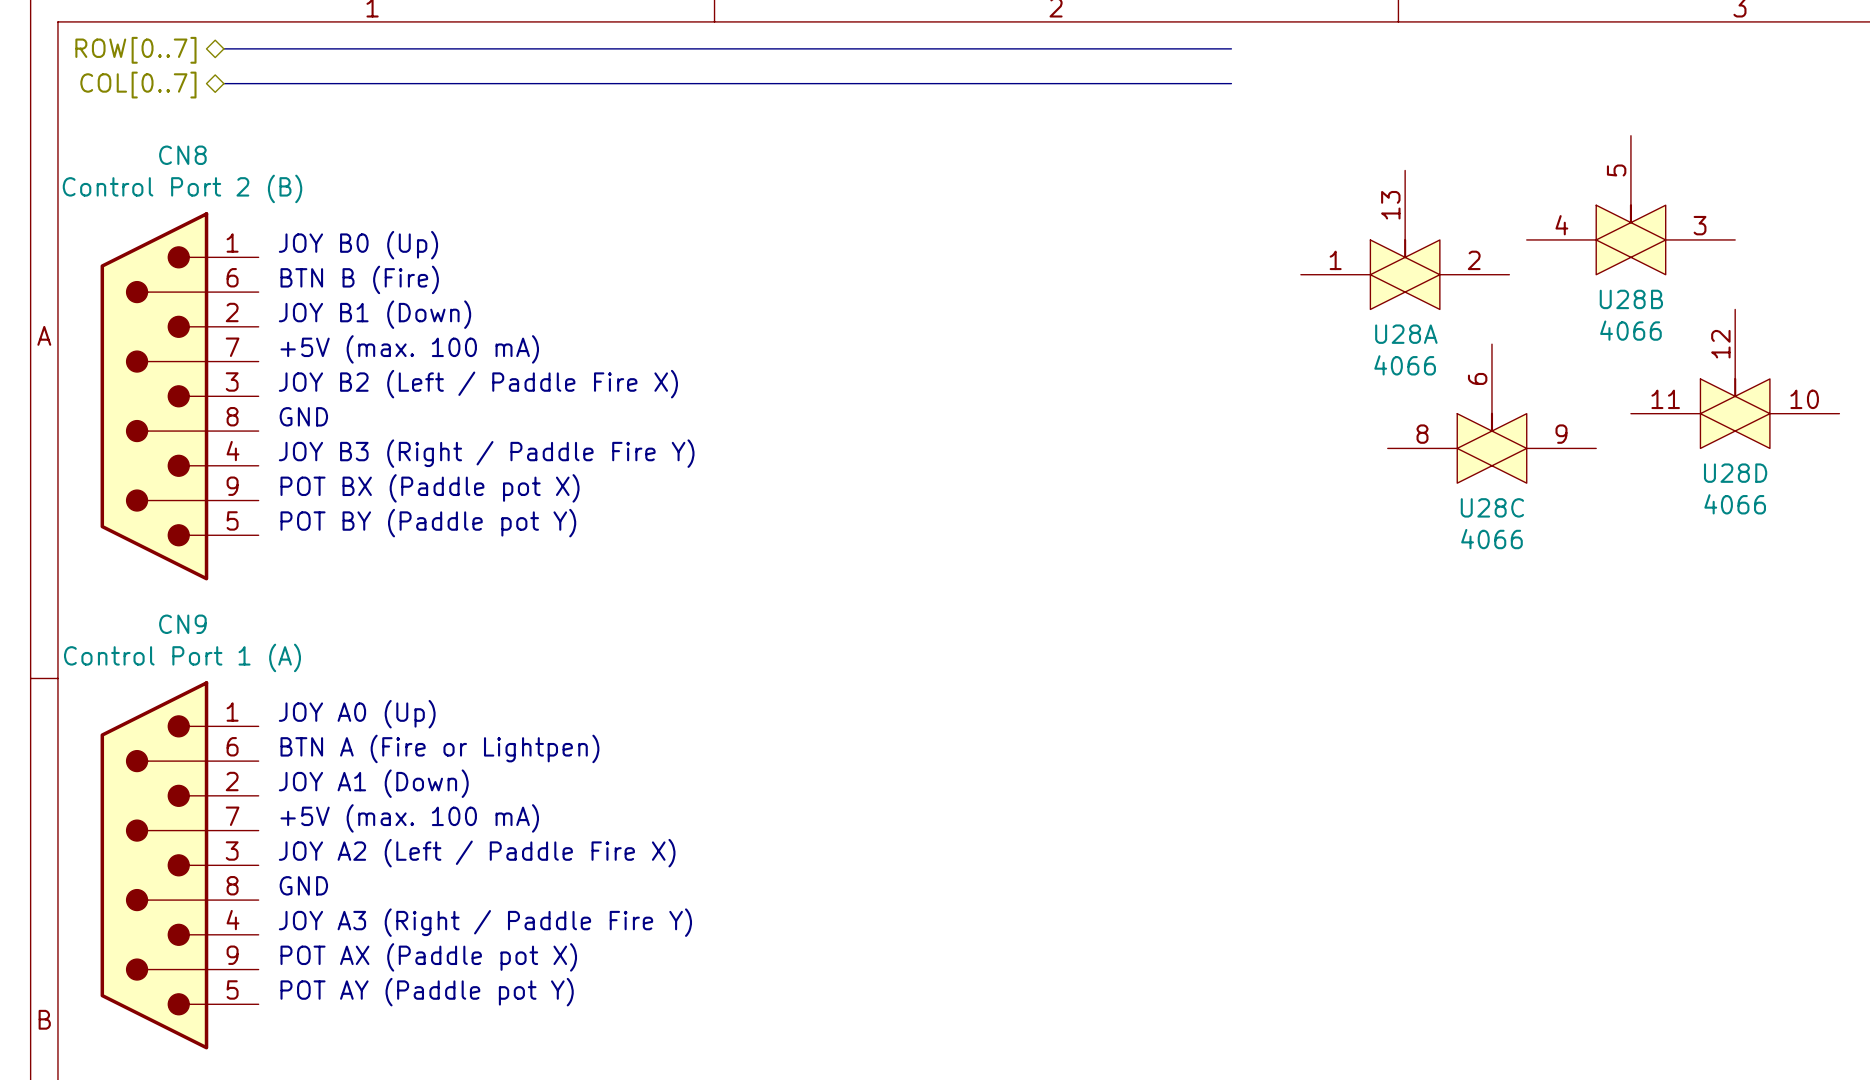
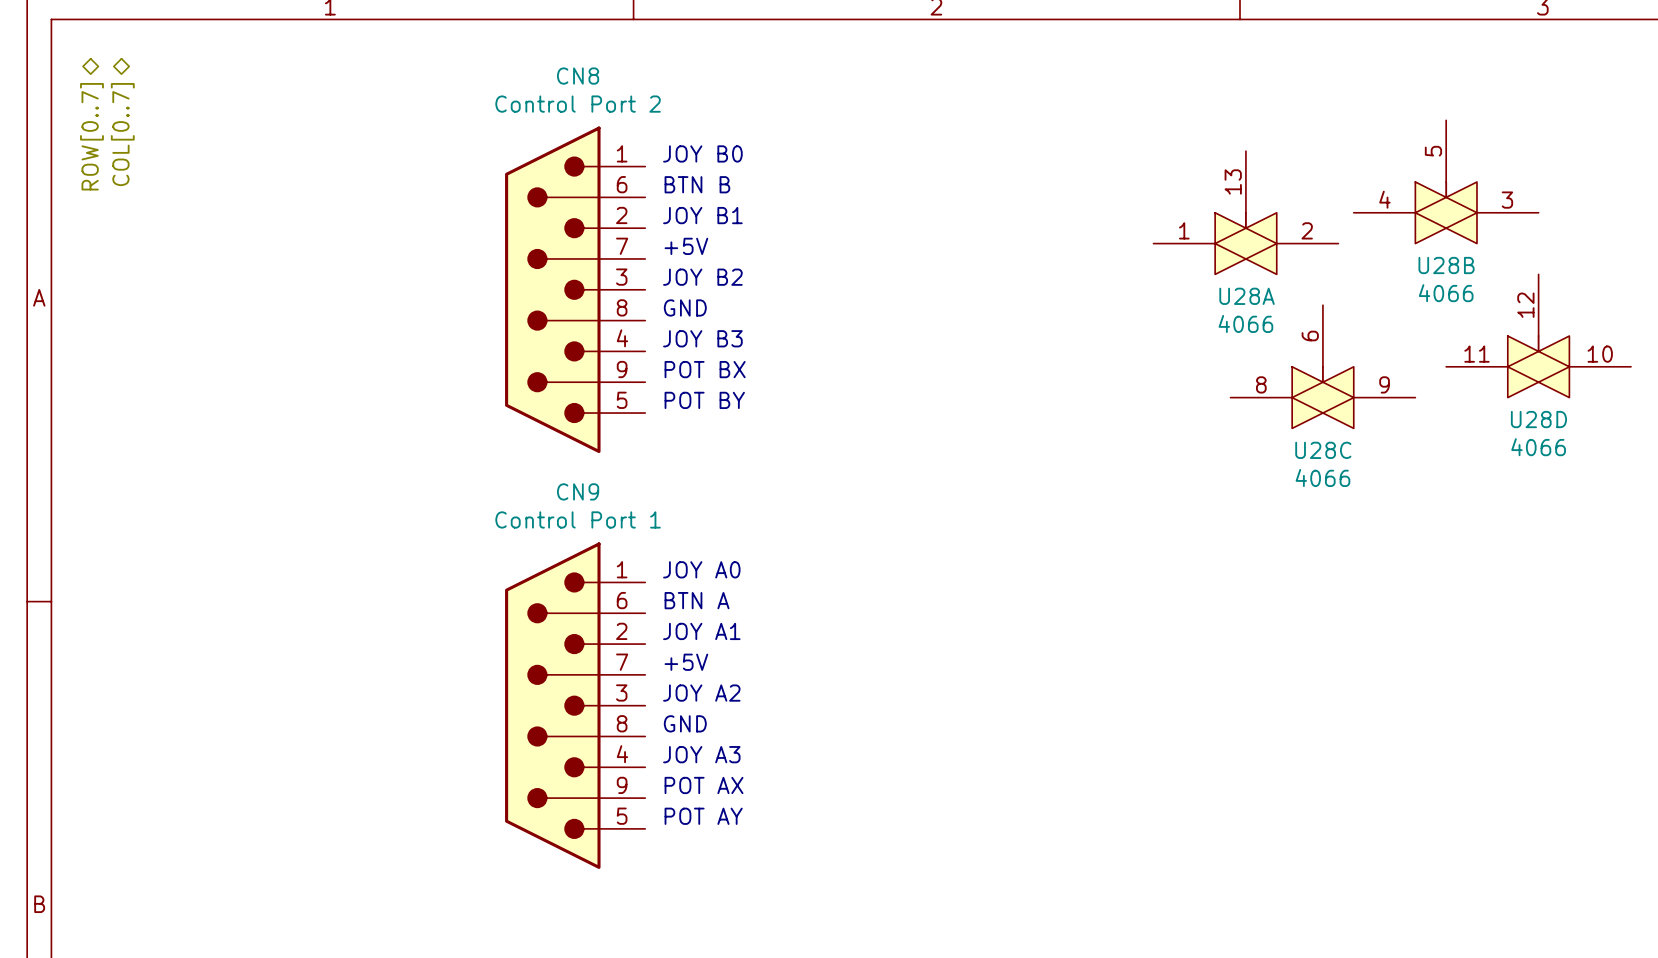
bus: (223, 48) (1231, 48) -> none
hierarchical label rotation: 0° (135, 50) -> 90° counterclockwise (91, 136)
bus: (223, 83) (1231, 83) -> none
hierarchical label rotation: 0° (138, 85) -> 90° counterclockwise (122, 134)
text: none -> JOY B0 (702, 153)
CN8 value: Control Port 2 (B) (182, 188) -> Control Port 2 (578, 104)
text: none -> BTN B (697, 184)
text: none -> JOY B1 (702, 215)
text: JOY B0 (Up) (358, 245) -> none
text: none -> +5V (686, 246)
text: BTN B (Fire) (359, 279) -> none
text: none -> JOY B2 (702, 277)
text: JOY B1 (Down) (374, 314) -> none
text: none -> GND (685, 307)
text: +5V (max. 100 mA) (409, 349) -> none
text: none -> JOY B3 (702, 338)
text: JOY B2 (Left / Paddle Fire X) (478, 384) -> none
CN8 position: (179, 396) -> (575, 289)
text: GND (303, 416) -> none
text: none -> POT BX (705, 369)
text: none -> POT BY (704, 400)
text: JOY B3 (Right / Paddle Fire Y) (486, 453) -> none
text: POT BX (Paddle pot X) (430, 488) -> none
text: POT BY (Paddle pot Y) (428, 523) -> none
text: none -> JOY A0 (701, 569)
CN9 value: Control Port 1 (A) (182, 657) -> Control Port 1 (578, 519)
text: none -> BTN A (697, 600)
text: none -> JOY A1 (701, 631)
text: JOY A0 (Up) (357, 714) -> none
text: none -> +5V (686, 662)
text: BTN A (Fire or Lightpen) (439, 748) -> none
text: none -> JOY A2 (701, 693)
text: JOY A1 (Down) (373, 783) -> none
text: none -> GND (685, 723)
text: +5V (max. 100 mA) (409, 818) -> none
text: none -> JOY A3 (701, 754)
text: JOY A2 (Left / Paddle Fire X) (477, 853) -> none
CN9 position: (179, 865) -> (575, 705)
text: GND (303, 885) -> none
text: none -> POT AX (704, 785)
text: none -> POT AY (703, 816)
text: JOY A3 (Right / Paddle Fire Y) (485, 922) -> none
text: POT AX (Paddle pot X) (428, 957) -> none
text: POT AY (Paddle pot Y) (427, 992) -> none

